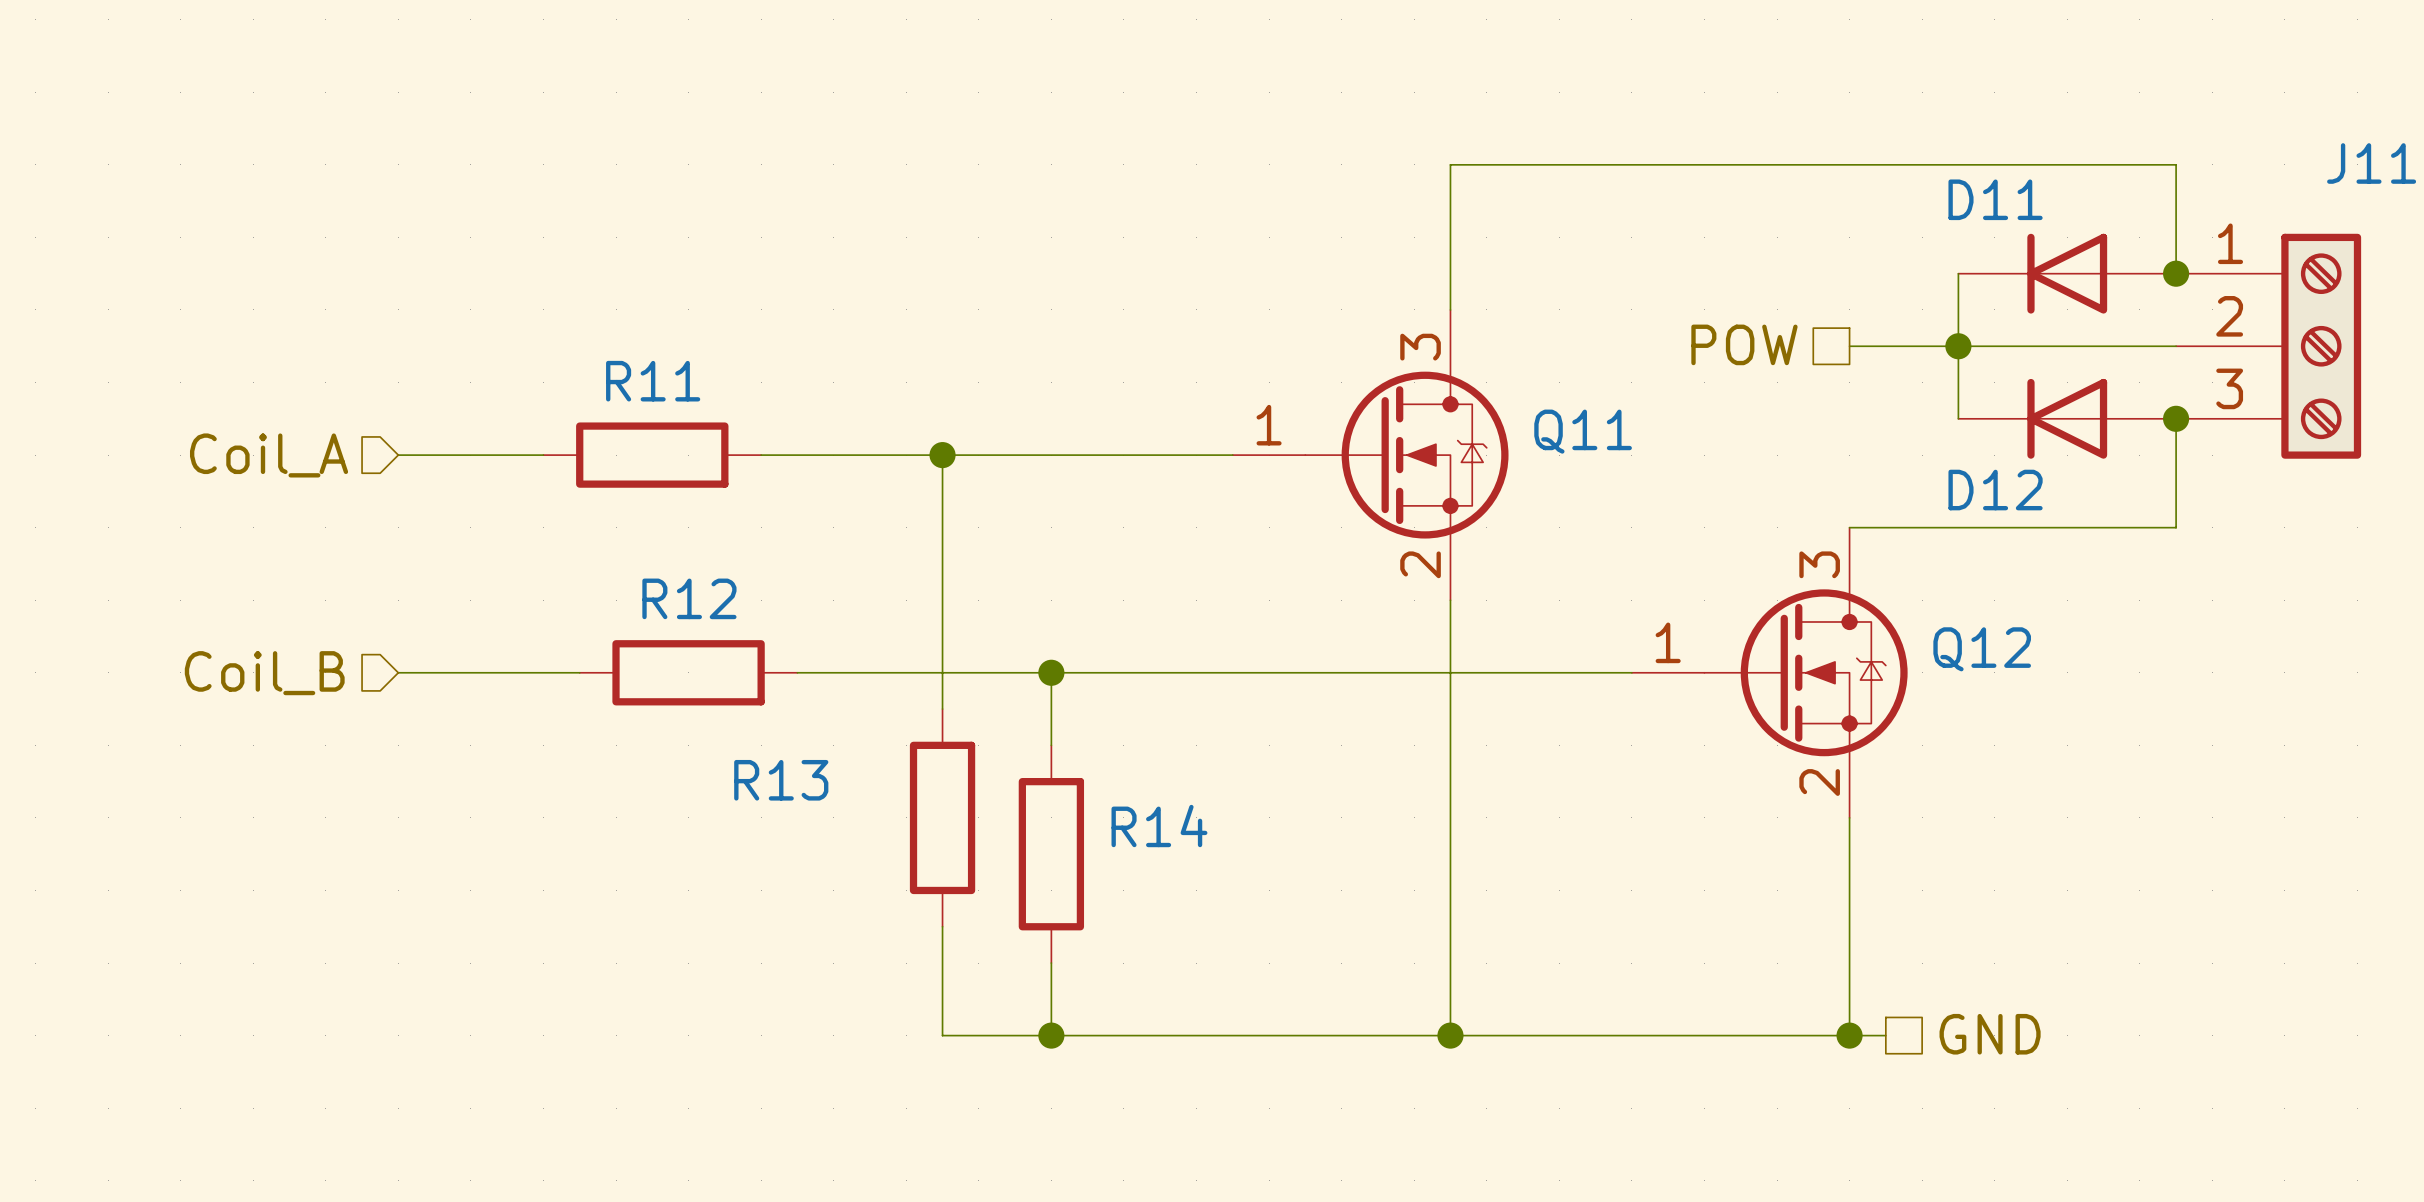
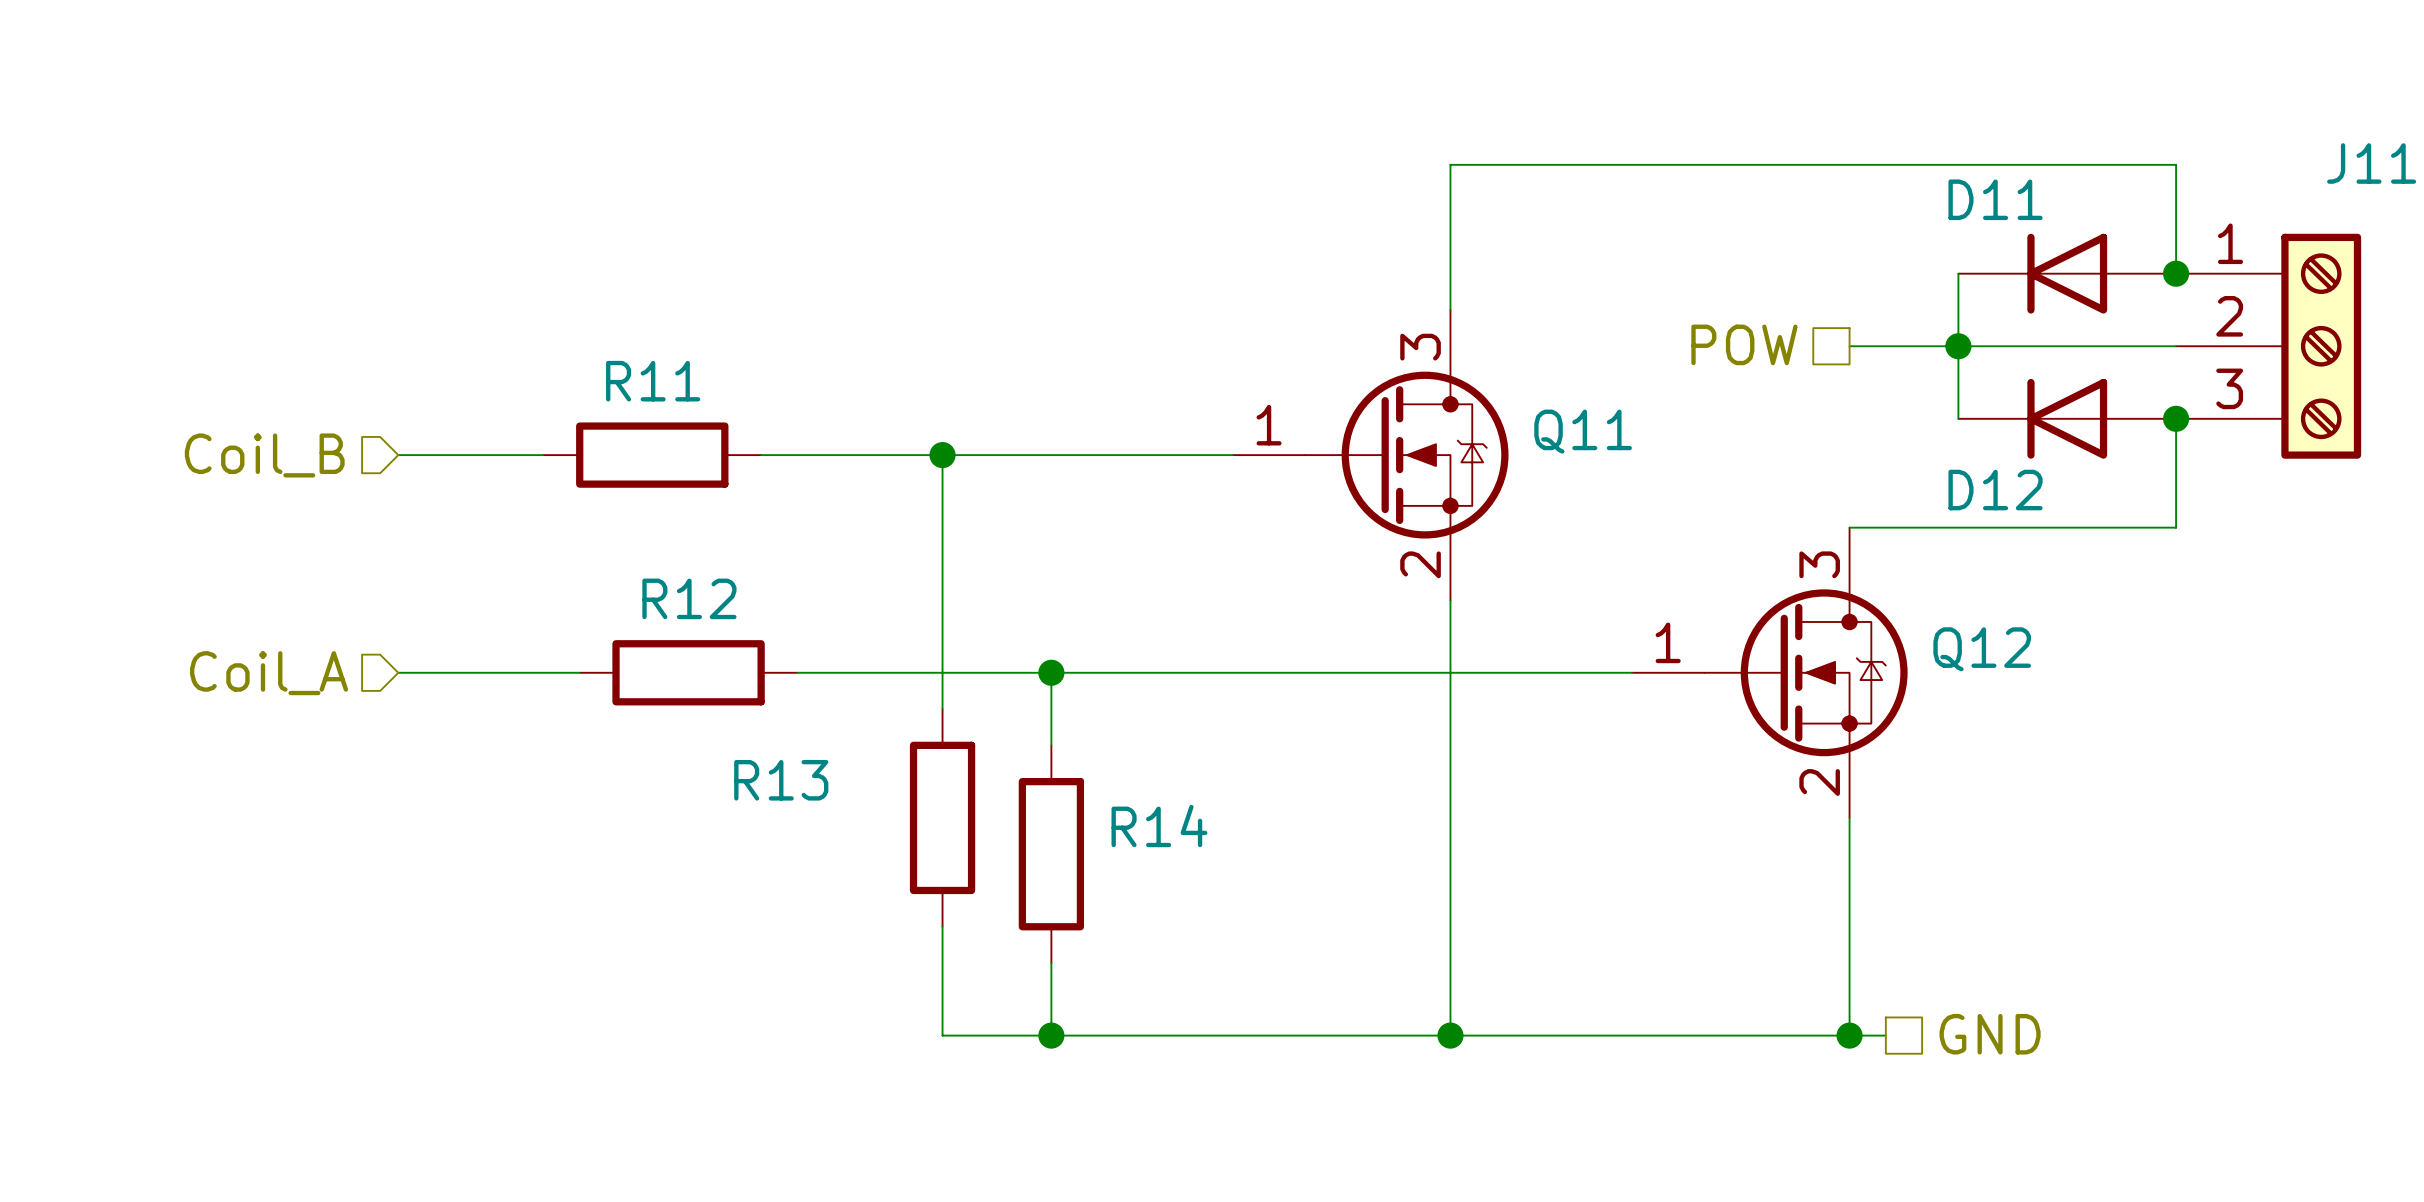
hierarchical label: Coil_A (269, 455) -> Coil_B (264, 455)
hierarchical label: Coil_B (264, 673) -> Coil_A (269, 673)

